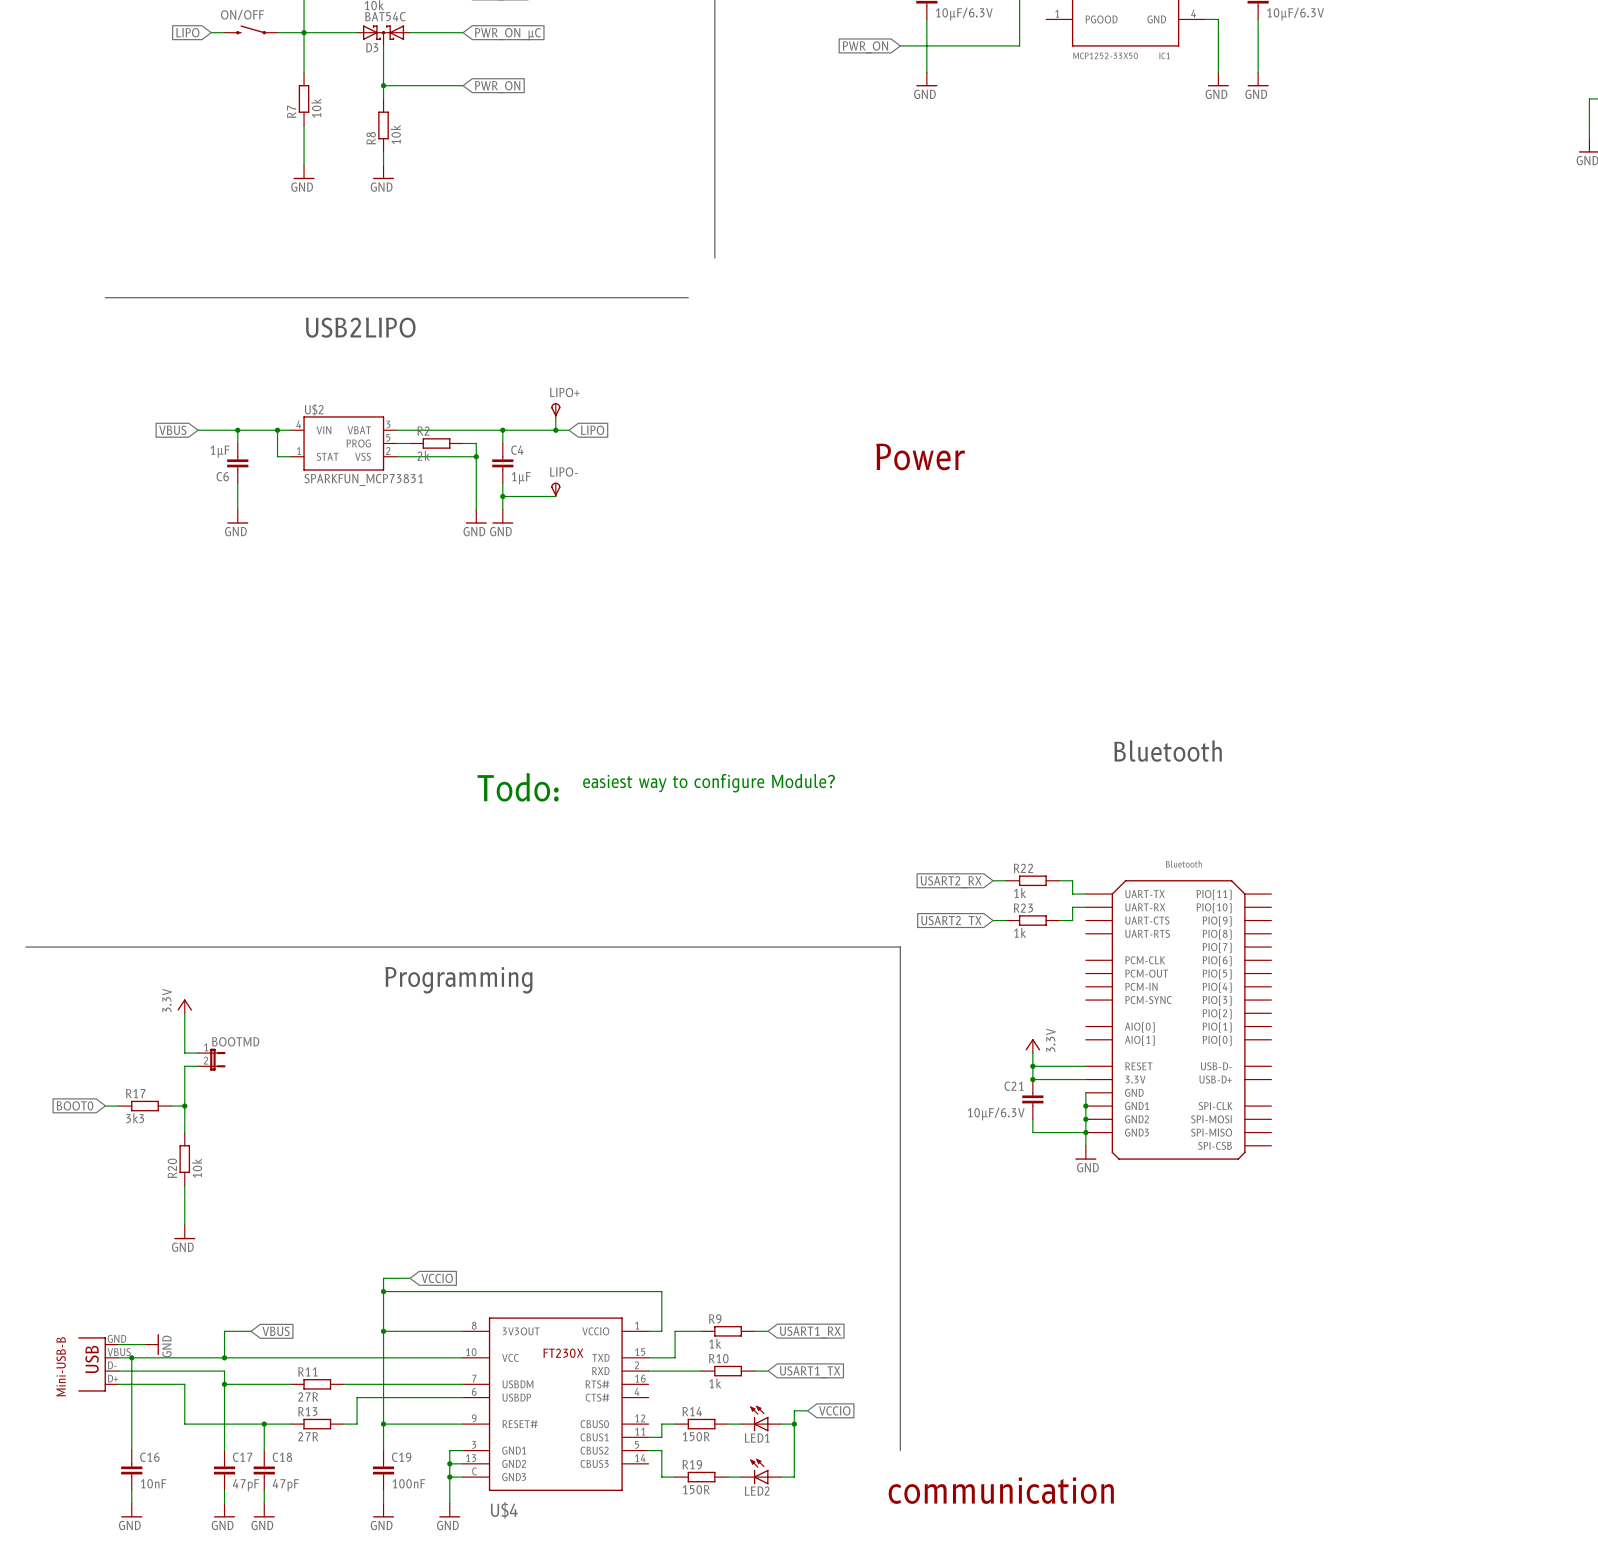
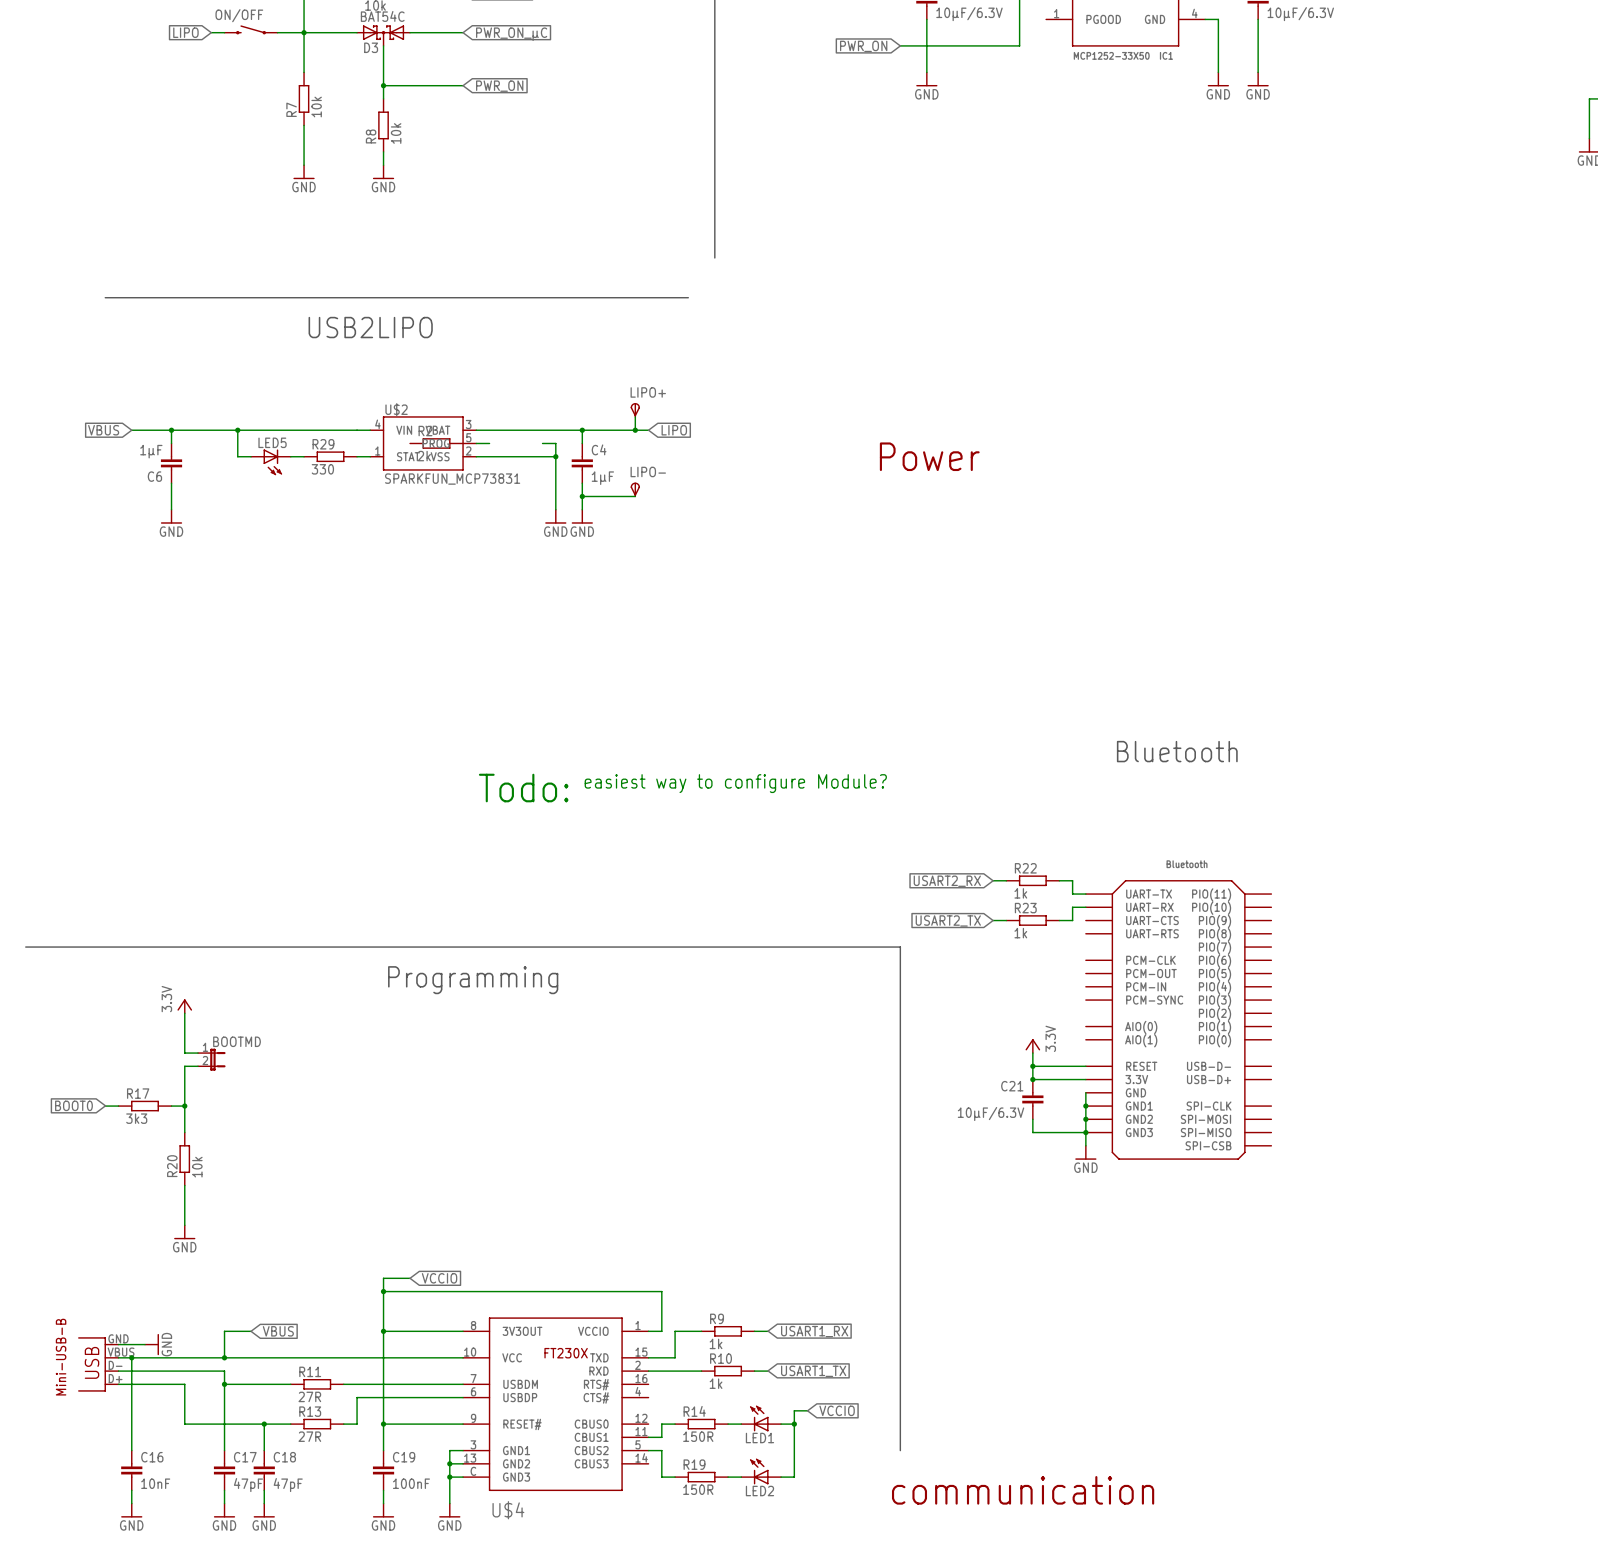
LIPO+ position: (555, 410) -> (635, 410)
wire: (555, 416) (555, 430) -> (635, 416) (635, 430)
wire: none -> (131, 430) (198, 430)
wire: none -> (171, 430) (171, 443)
junction: none -> (171, 430)
global label position: VBUS (172, 430) -> VBUS (103, 430)
junction: (277, 430) -> none
wire: (396, 430) (476, 430) -> (290, 430) (370, 430)
wire: (502, 430) (502, 443) -> (582, 430) (582, 443)
junction: (502, 430) -> none
junction: (555, 430) -> none
wire: none -> (569, 430) (648, 430)
junction: none -> (582, 430)
global label position: LIPO (592, 430) -> LIPO (674, 430)
junction: none -> (635, 430)
U$2 position: (343, 443) -> (423, 443)
wire: (396, 443) (410, 443) -> (476, 443) (489, 443)
wire: (463, 443) (476, 443) (476, 509) -> (542, 443) (555, 443) (555, 509)
R29: none -> 330 (330, 456)
wire: none -> (357, 456) (370, 456)
wire: (396, 456) (476, 456) -> (555, 456) (476, 456)
junction: (476, 456) -> none
junction: none -> (555, 456)
LED5: none -> (270, 462)
C6 position: (237, 463) -> (171, 463)
C4 position: (502, 463) -> (582, 463)
wire: (237, 483) (237, 509) -> (171, 483) (171, 509)
wire: (502, 483) (502, 509) -> (582, 483) (582, 509)
LIPO- position: (555, 489) -> (635, 489)
wire: (502, 496) (555, 496) -> (582, 496) (635, 496)
junction: (502, 496) -> none
junction: none -> (582, 496)
power symbol position: GND (237, 516) -> GND (171, 516)
power symbol: GND (476, 516) -> none
power symbol: GND (502, 516) -> none
power symbol: none -> GND (555, 516)
power symbol: none -> GND (582, 516)

